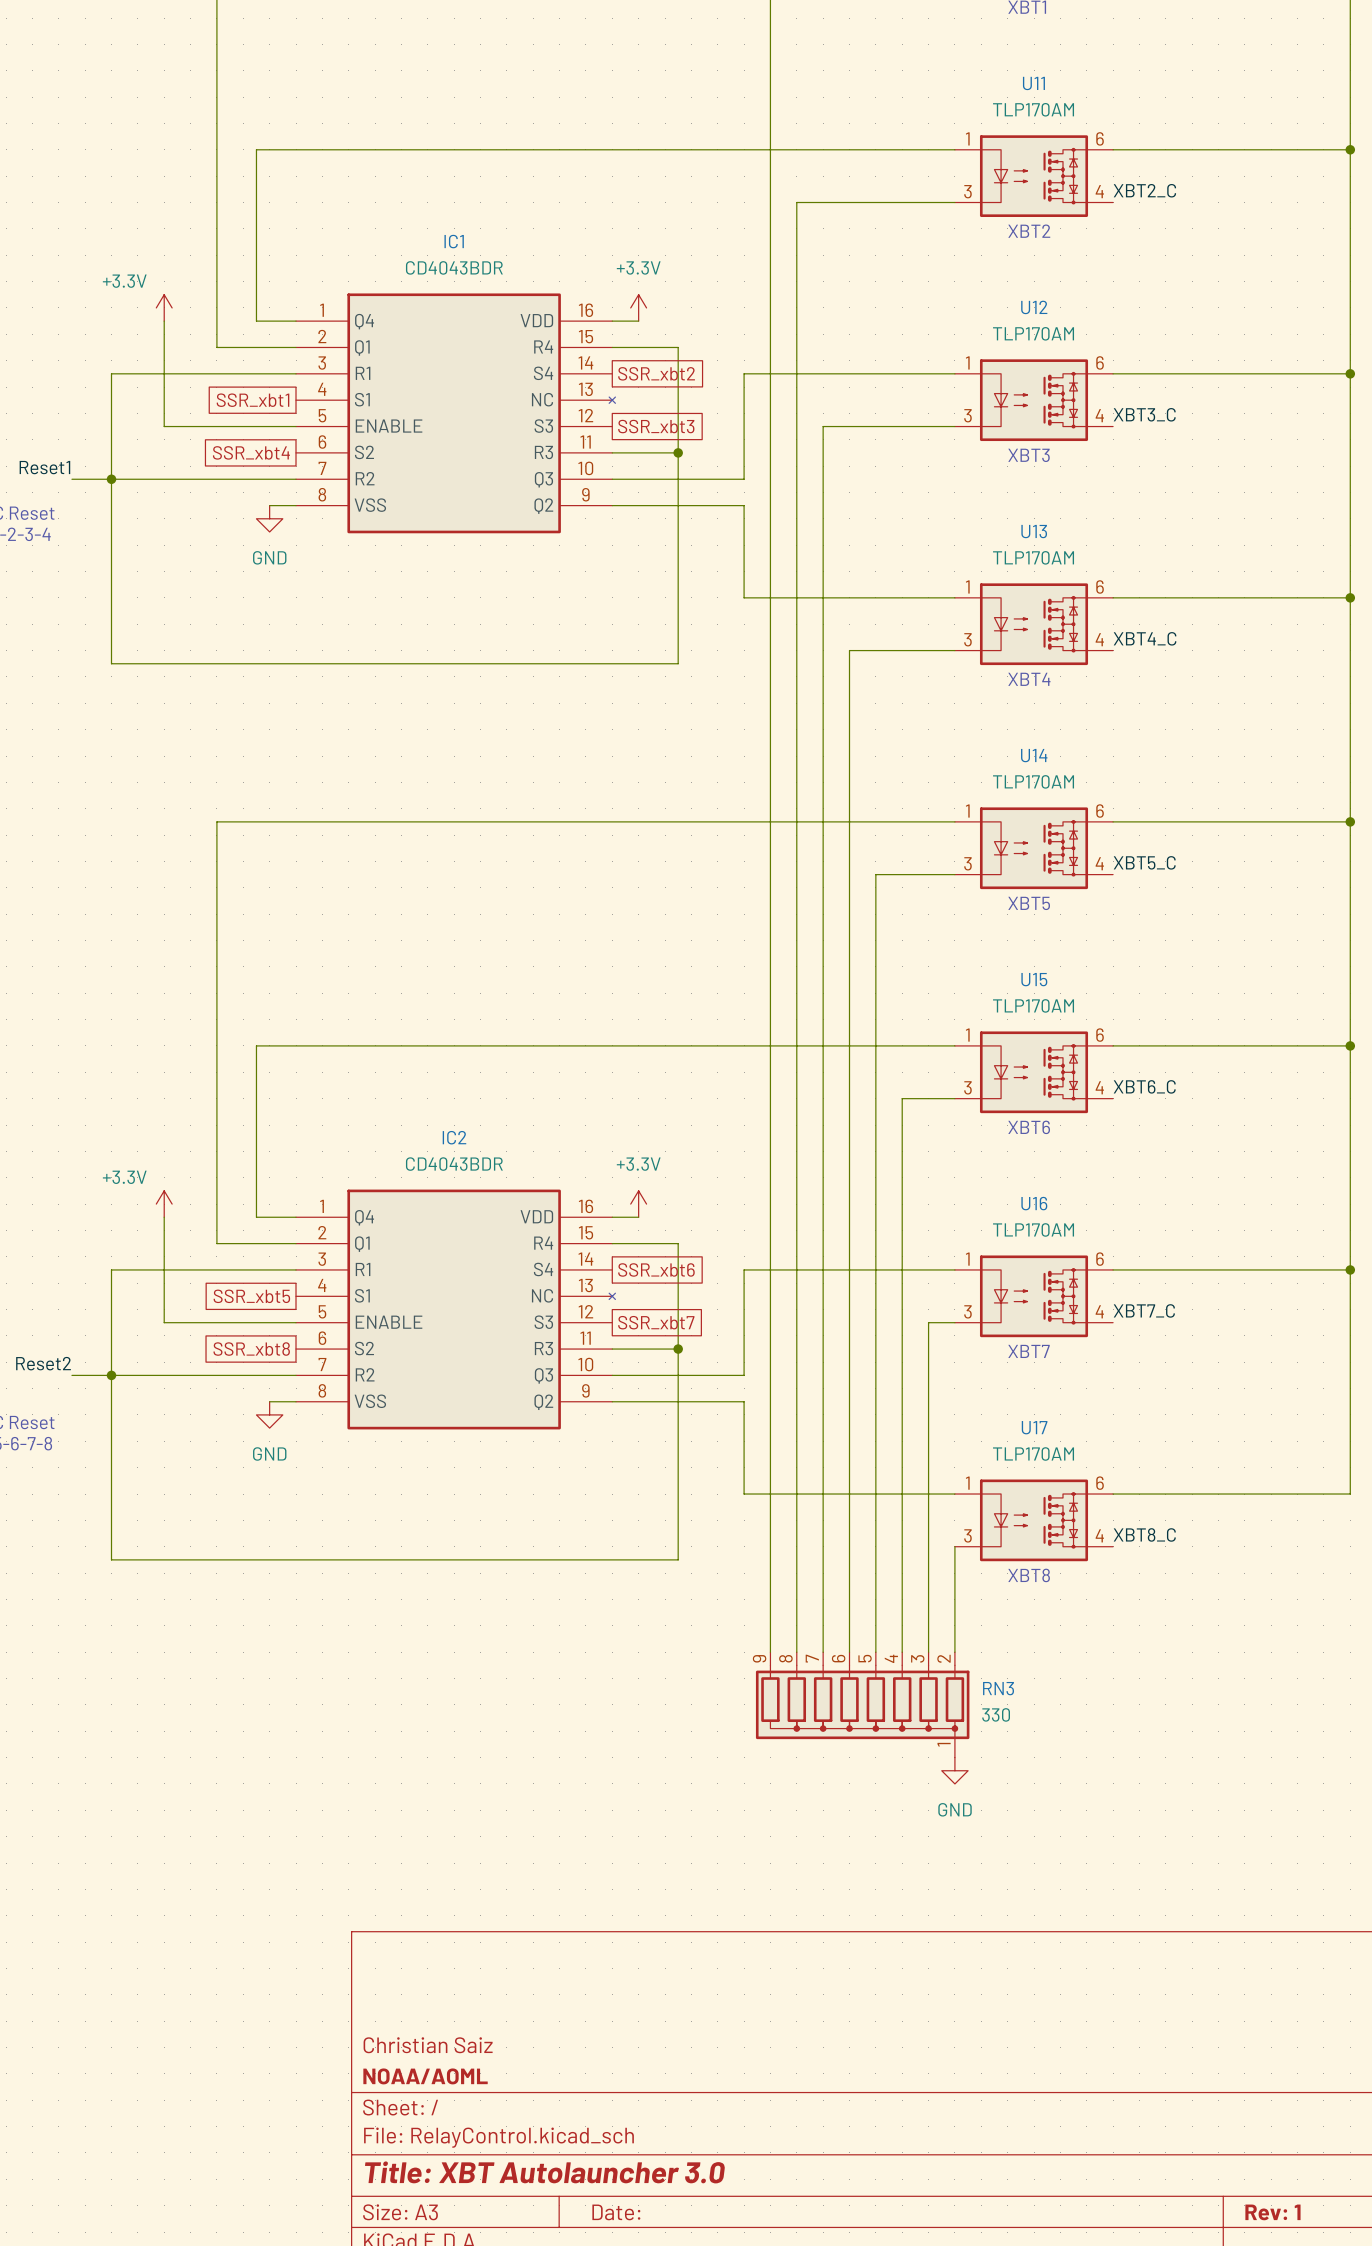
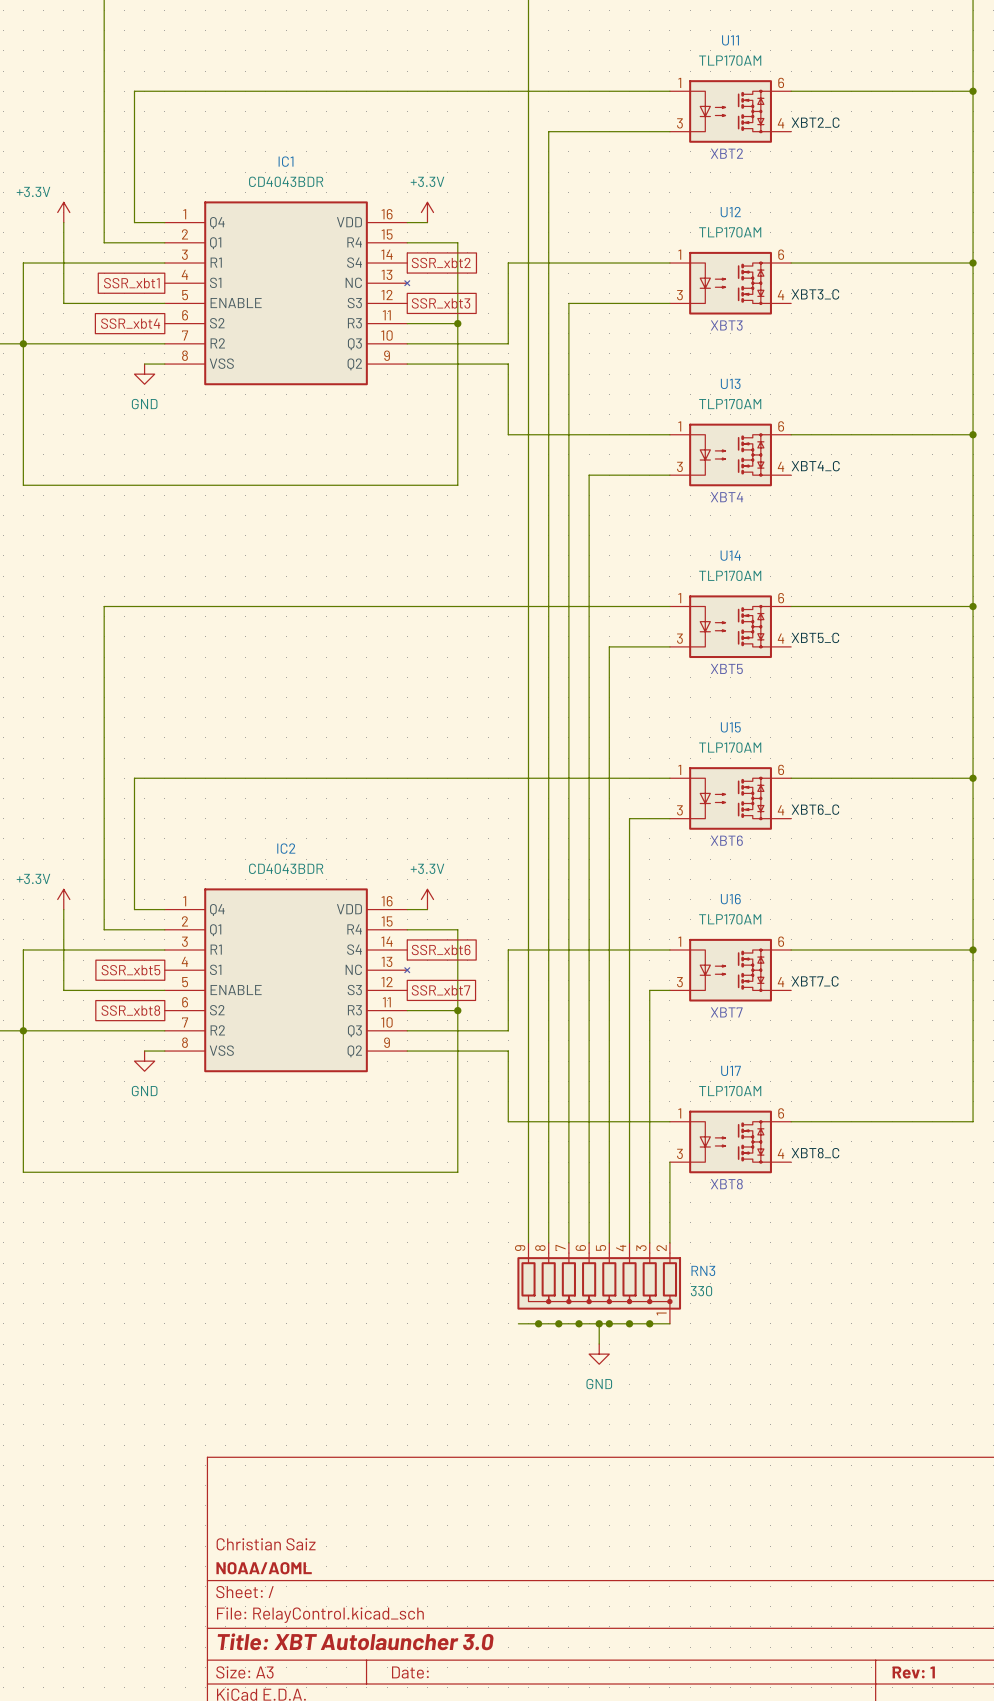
wire: none -> (518, 1323) (669, 1323)
junction: none -> (538, 1323)
junction: none -> (558, 1323)
junction: none -> (579, 1323)
wire: none -> (599, 1323) (599, 1344)
junction: none -> (599, 1323)
junction: none -> (609, 1323)
junction: none -> (629, 1323)
junction: none -> (649, 1323)
power symbol position: GND (954, 1770) -> GND (599, 1354)

